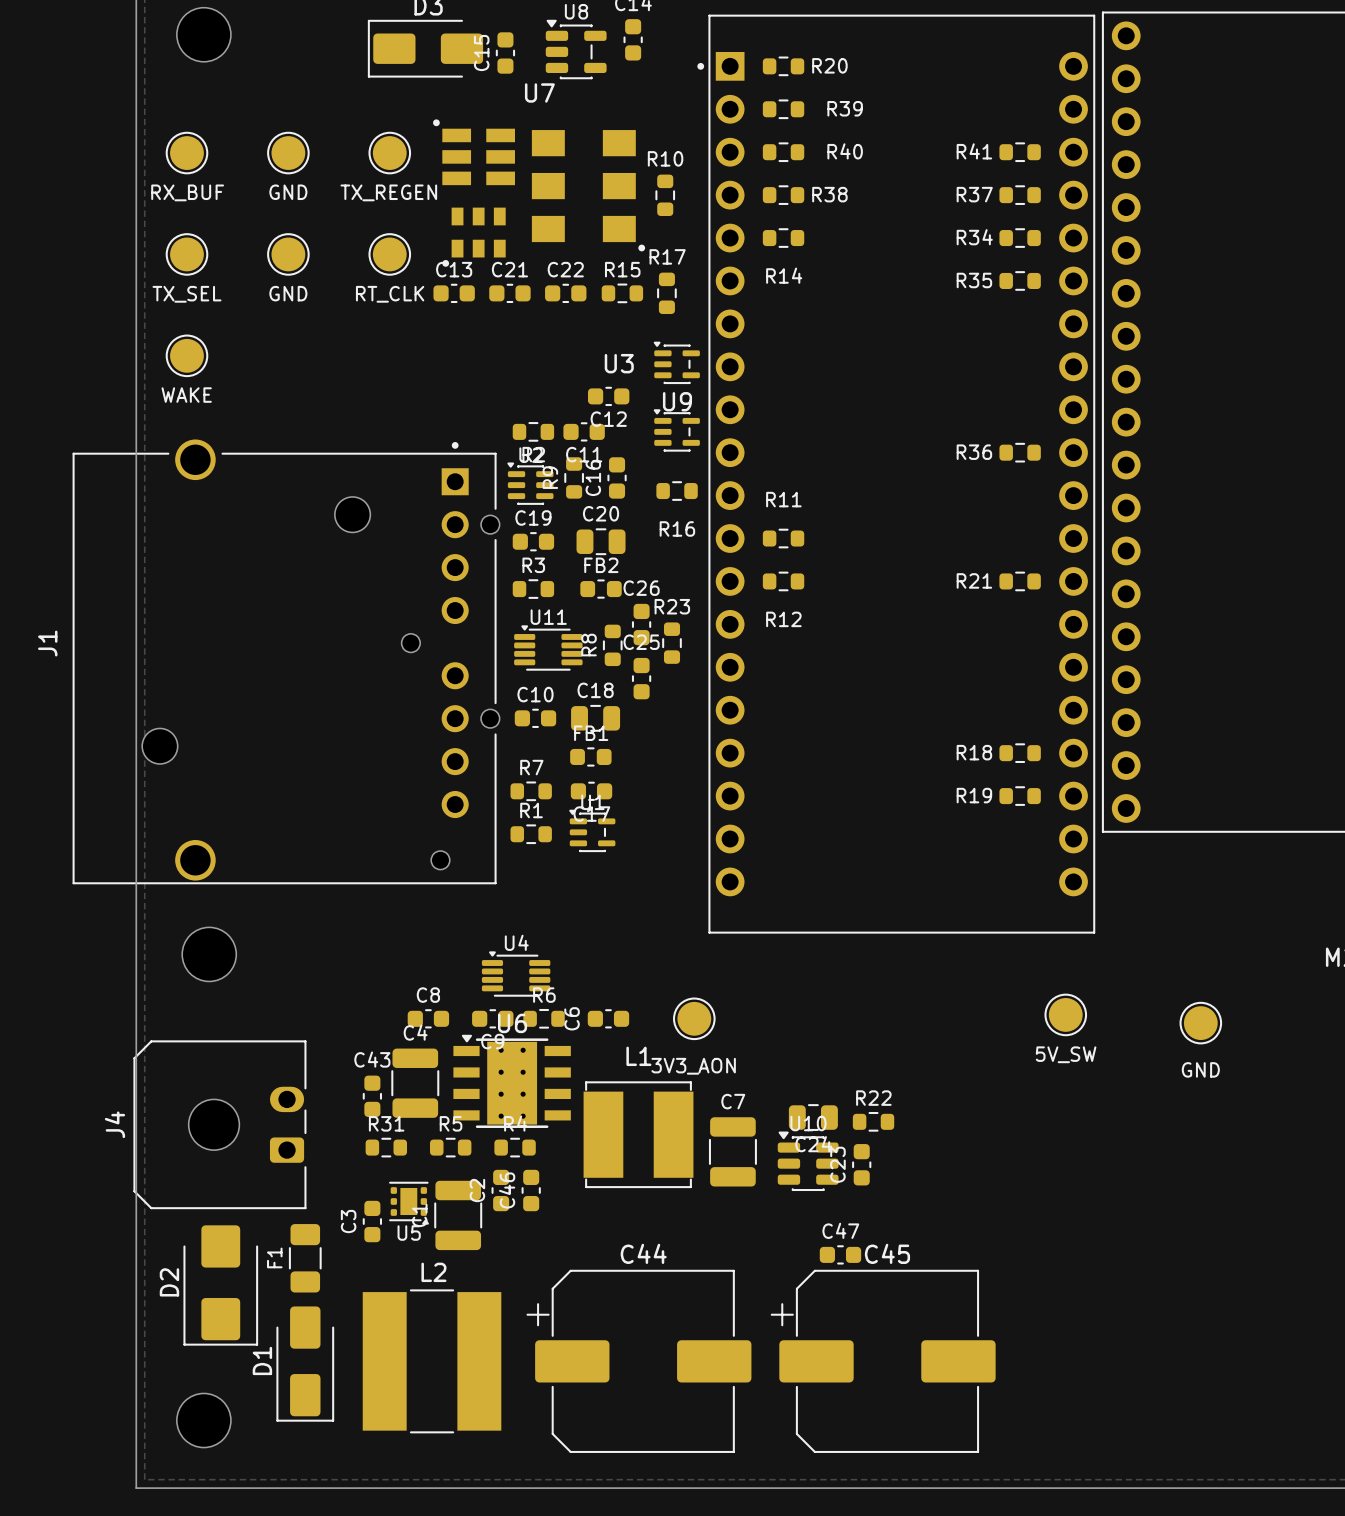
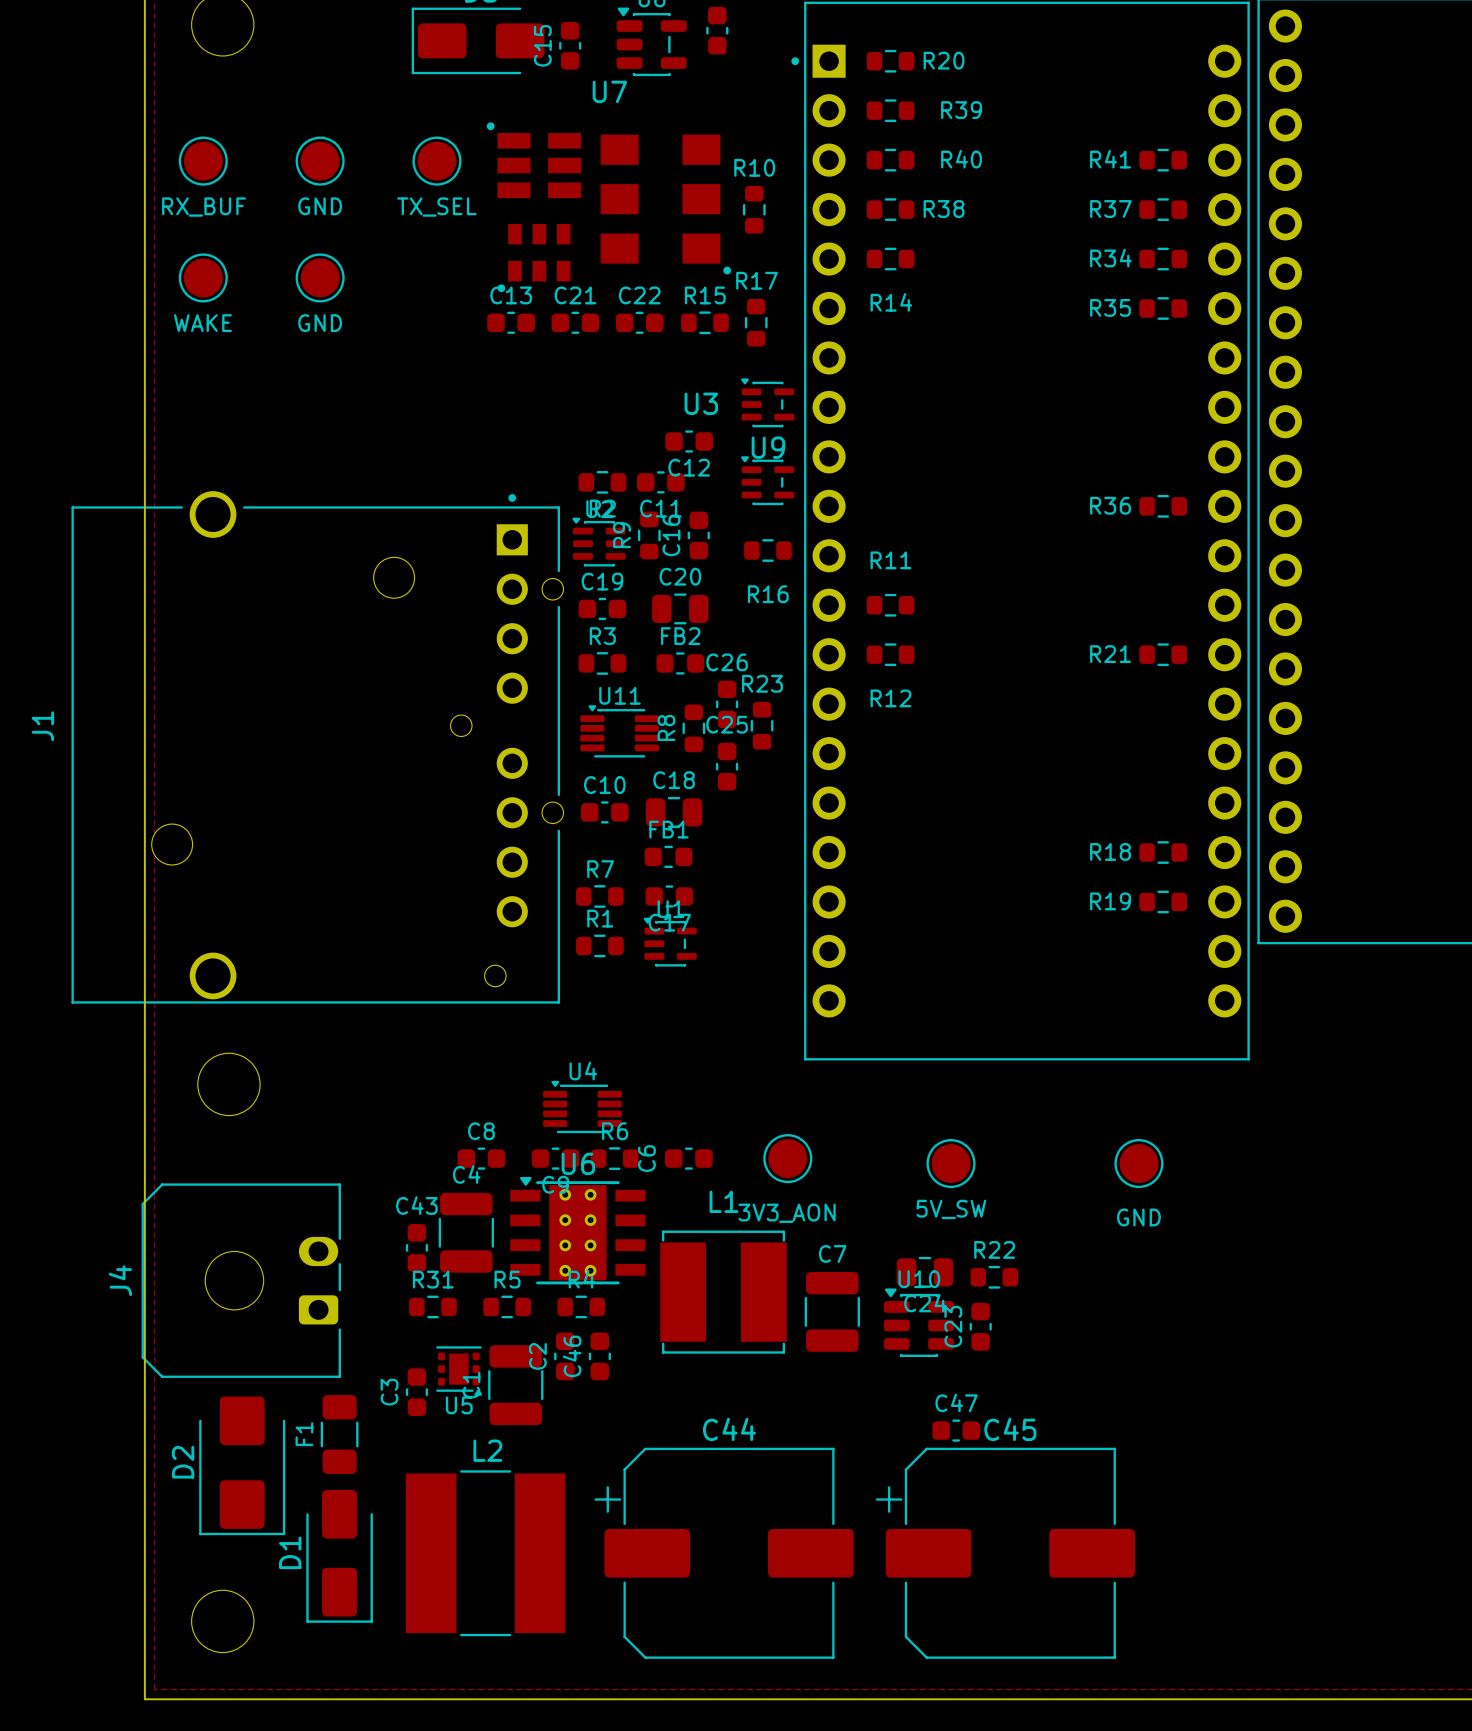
part value: TX_REGEN (388, 192) -> TX_SEL (436, 207)
part: RT_CLK (389, 254) -> none
part value: TX_SEL (186, 294) -> WAKE (202, 323)
part: WAKE (186, 355) -> none
part position: (1065, 1014) -> (951, 1163)
part position: (1200, 1023) -> (1138, 1163)

